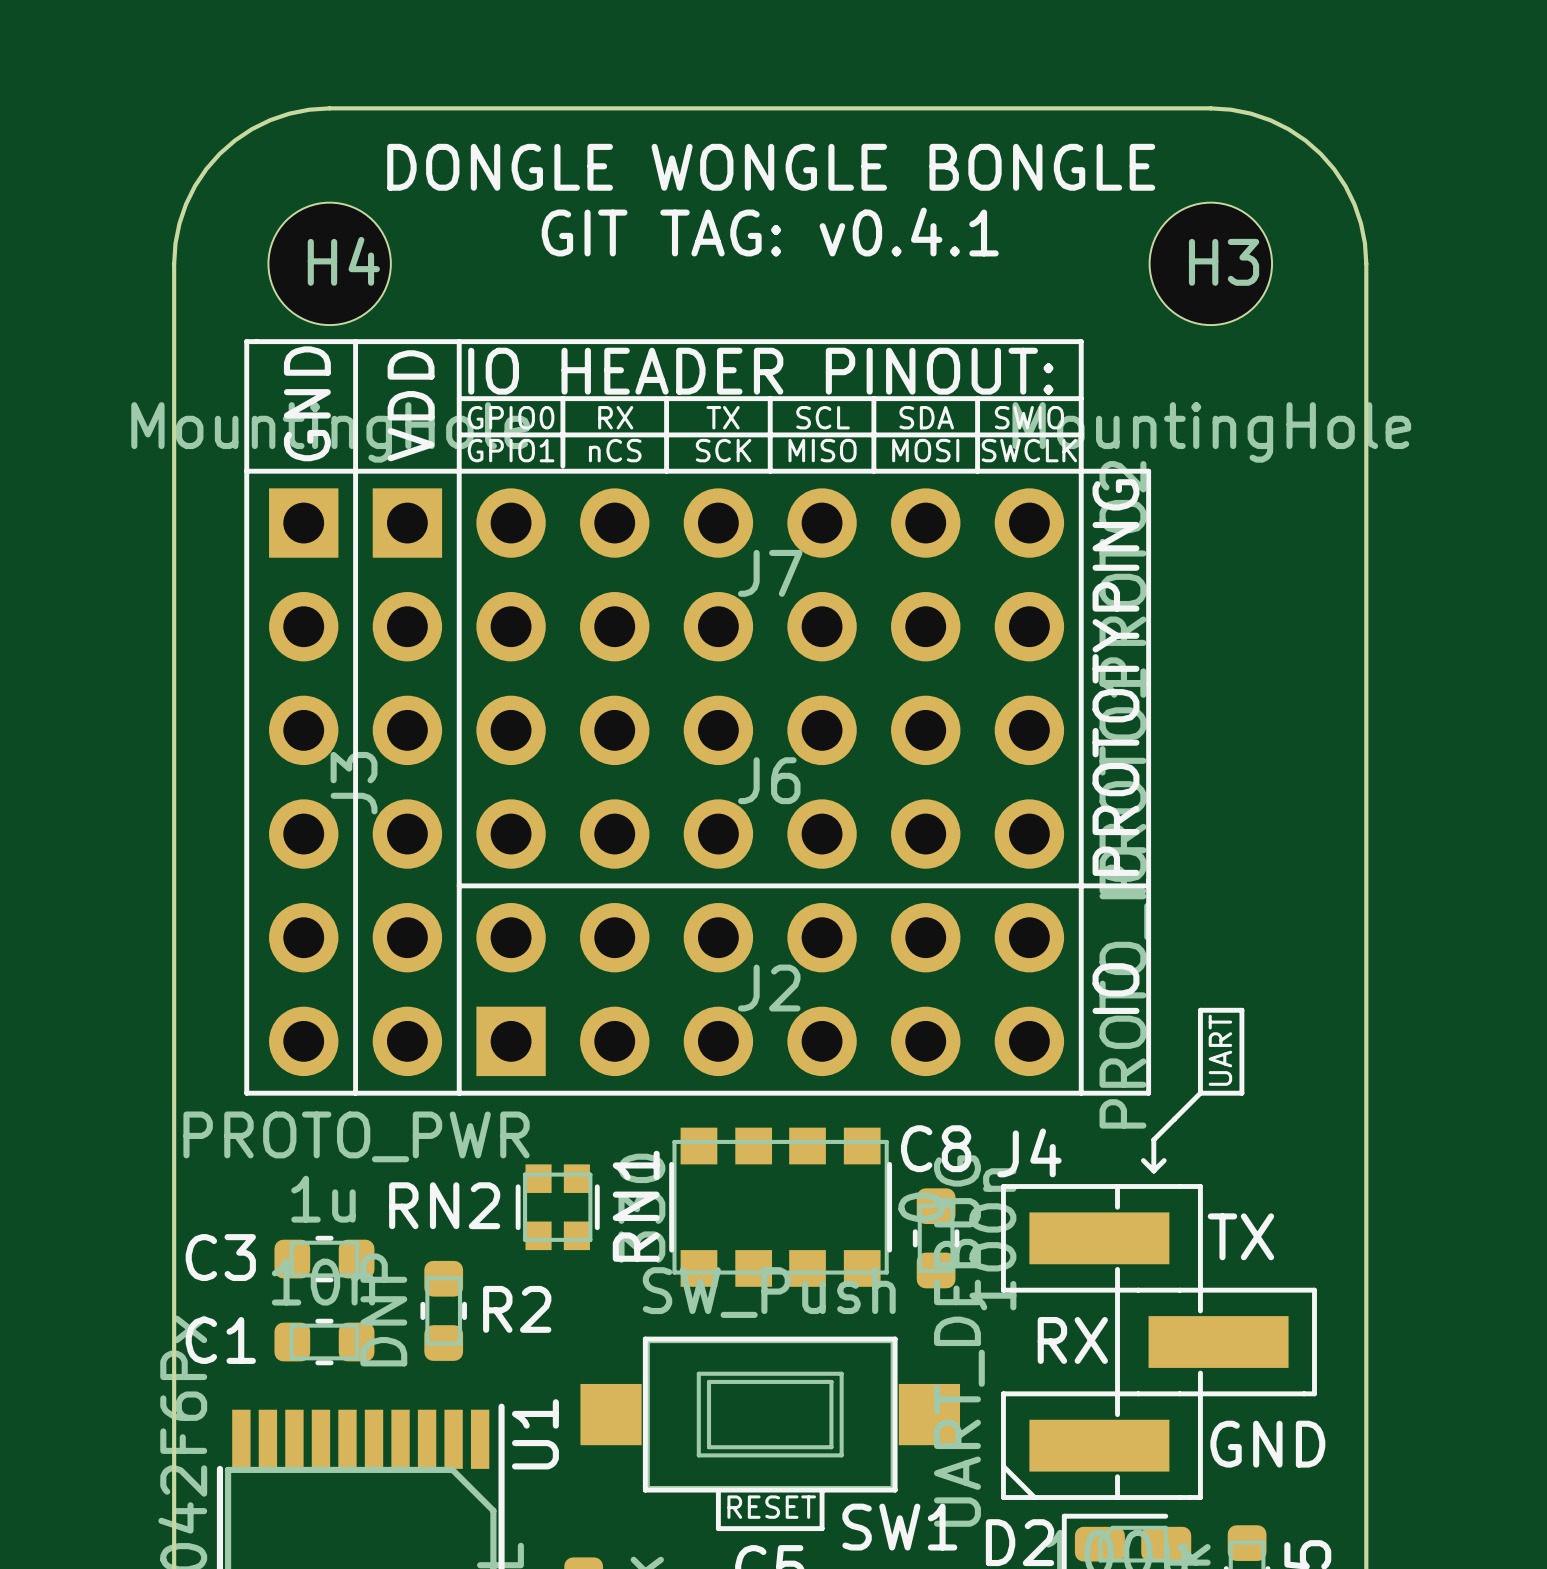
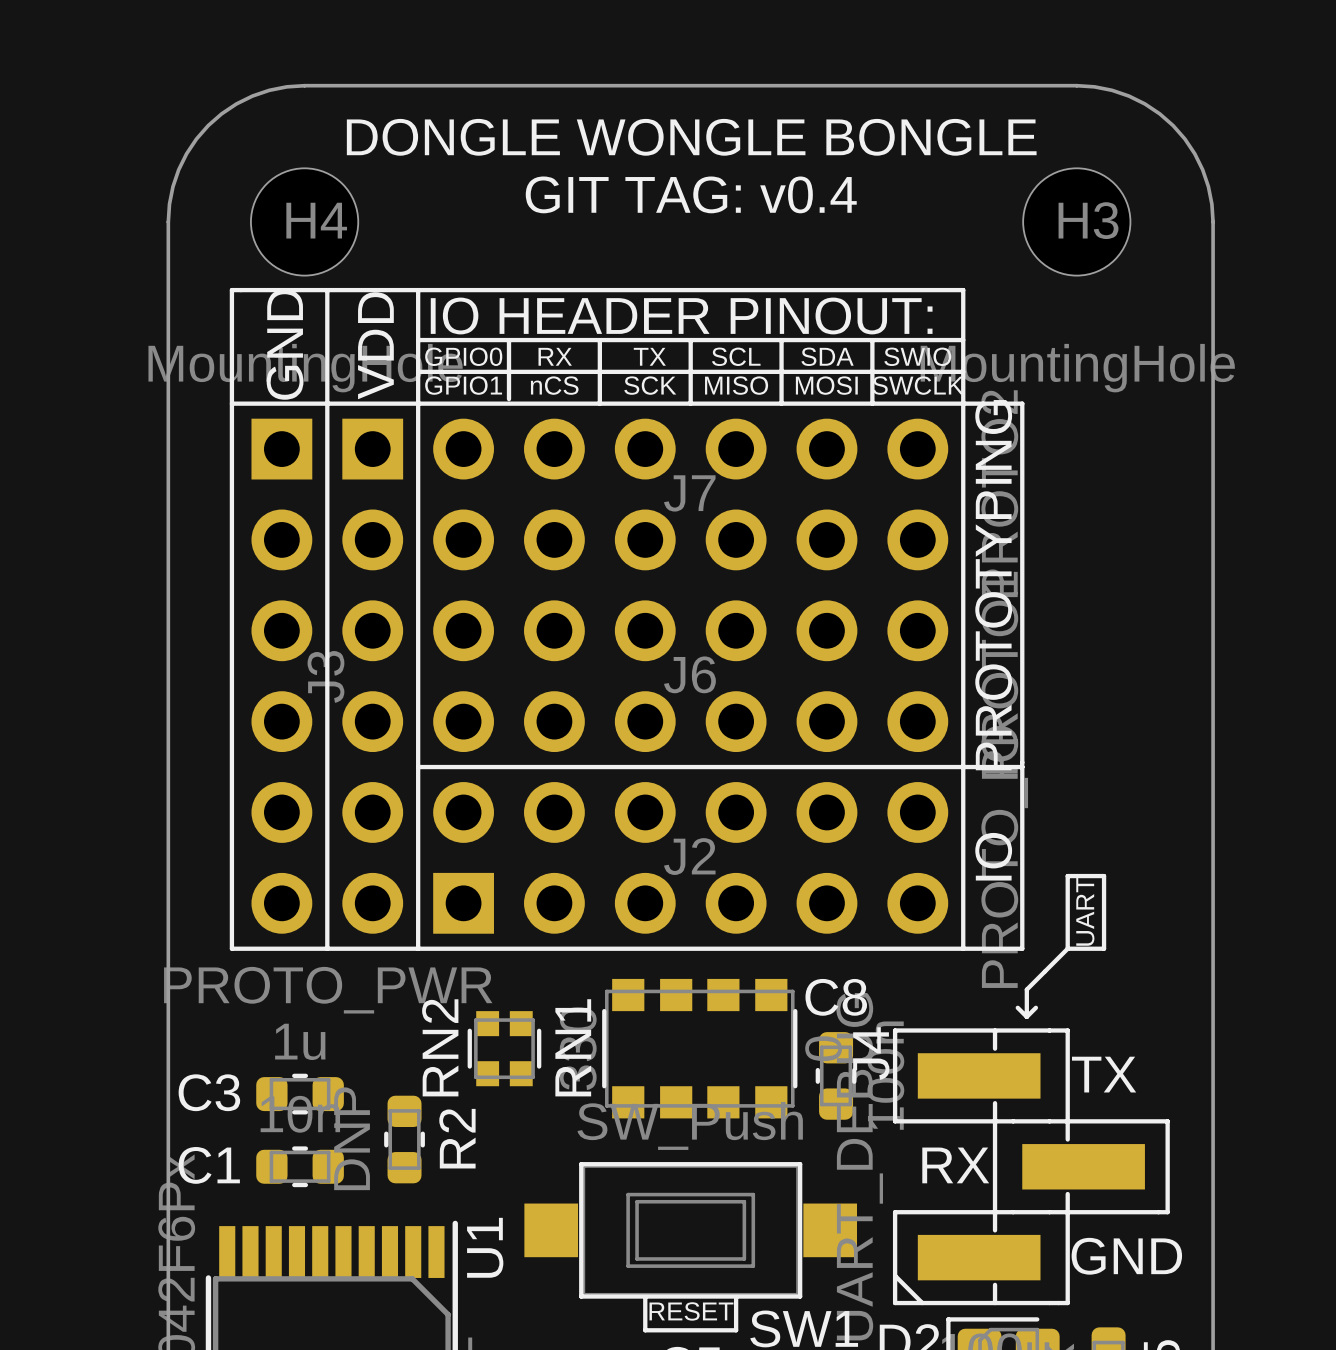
text: GIT TAG: v0.4.1 (770, 232) -> GIT TAG: v0.4 (691, 194)
J4 name rotation: 0° (1029, 1152) -> 90° counterclockwise (871, 1053)
RN2 name rotation: 0° (444, 1205) -> 90° counterclockwise (440, 1047)
R2 name rotation: 0° (517, 1309) -> 90° counterclockwise (457, 1138)

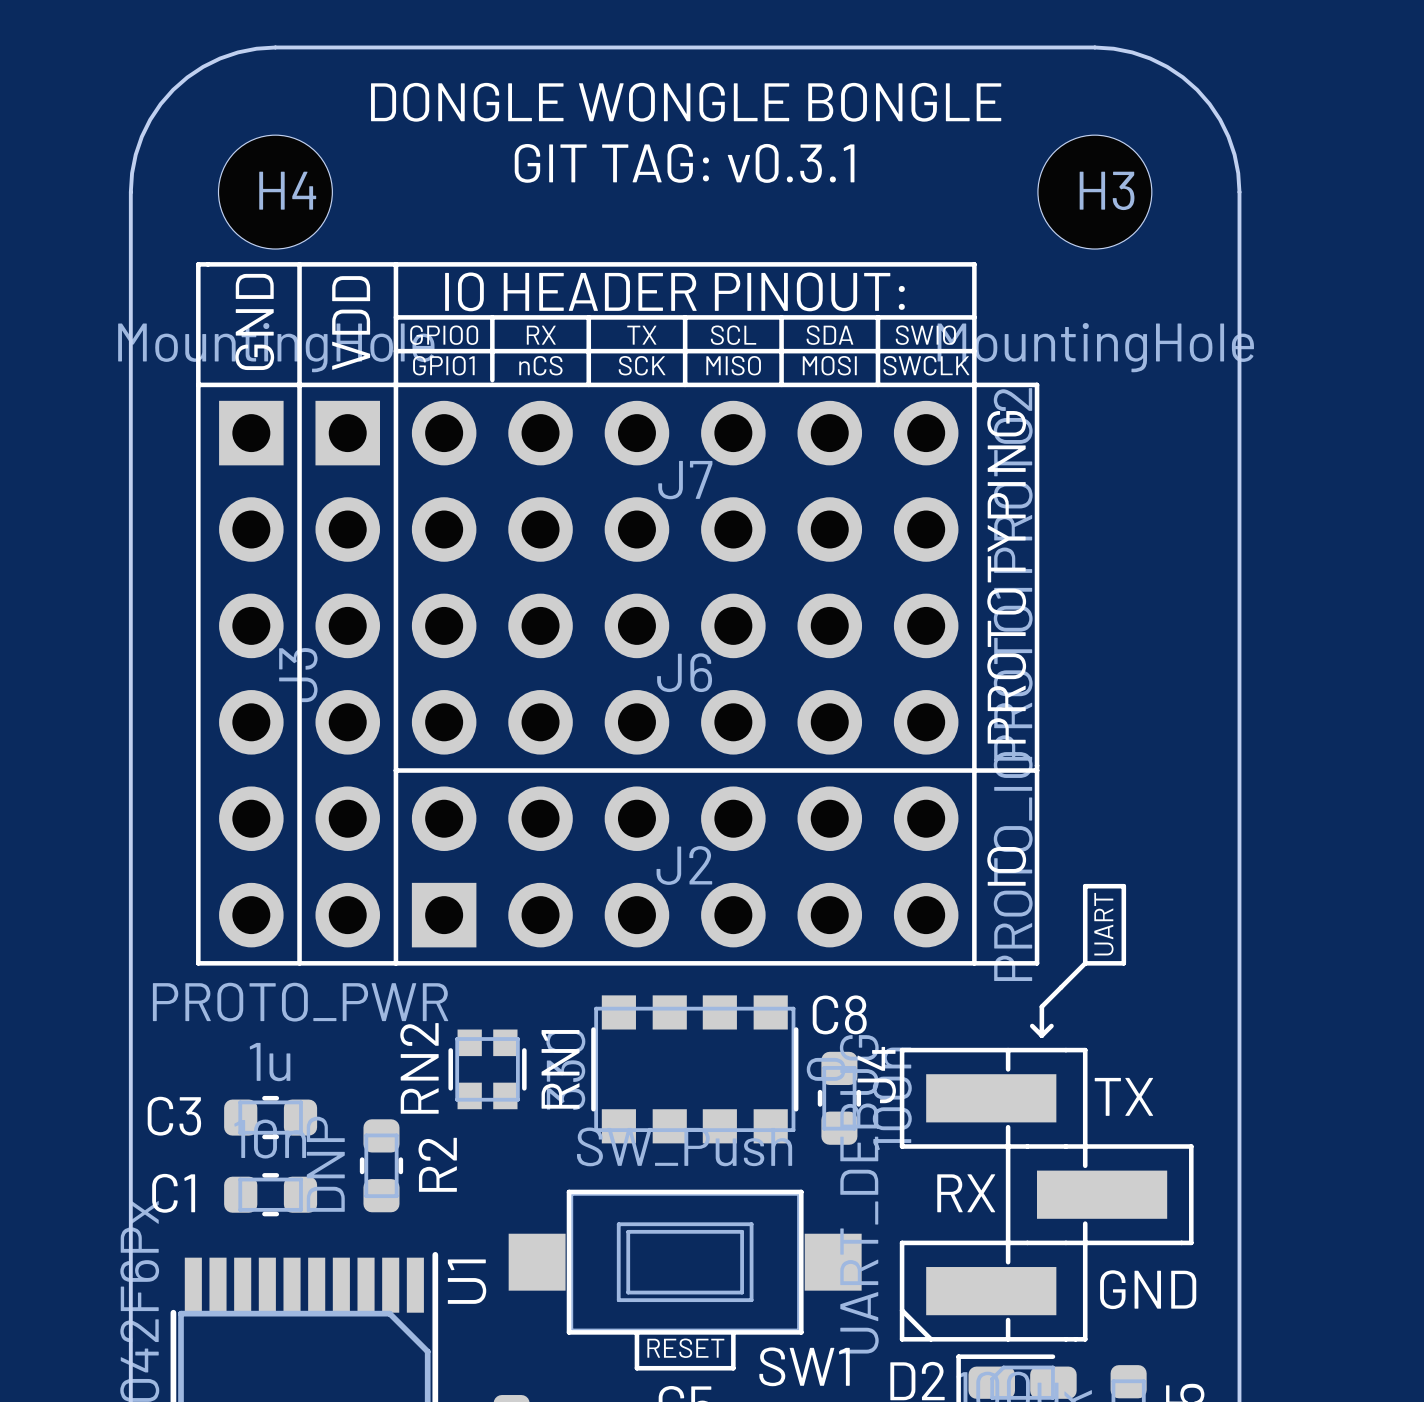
text: GIT TAG: v0.4 (691, 194) -> GIT TAG: v0.3.1 (684, 163)

